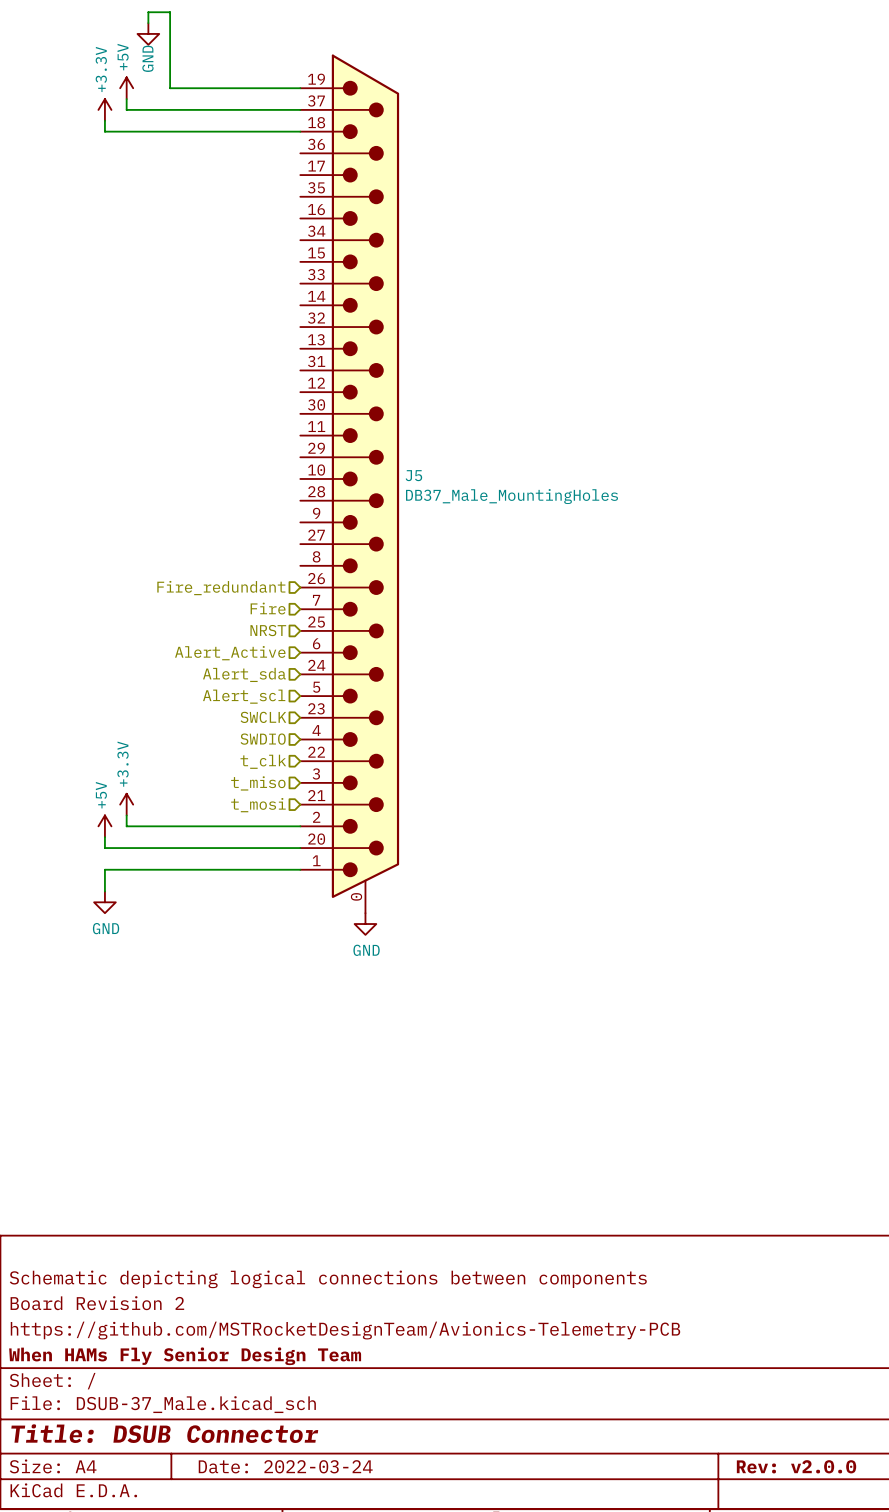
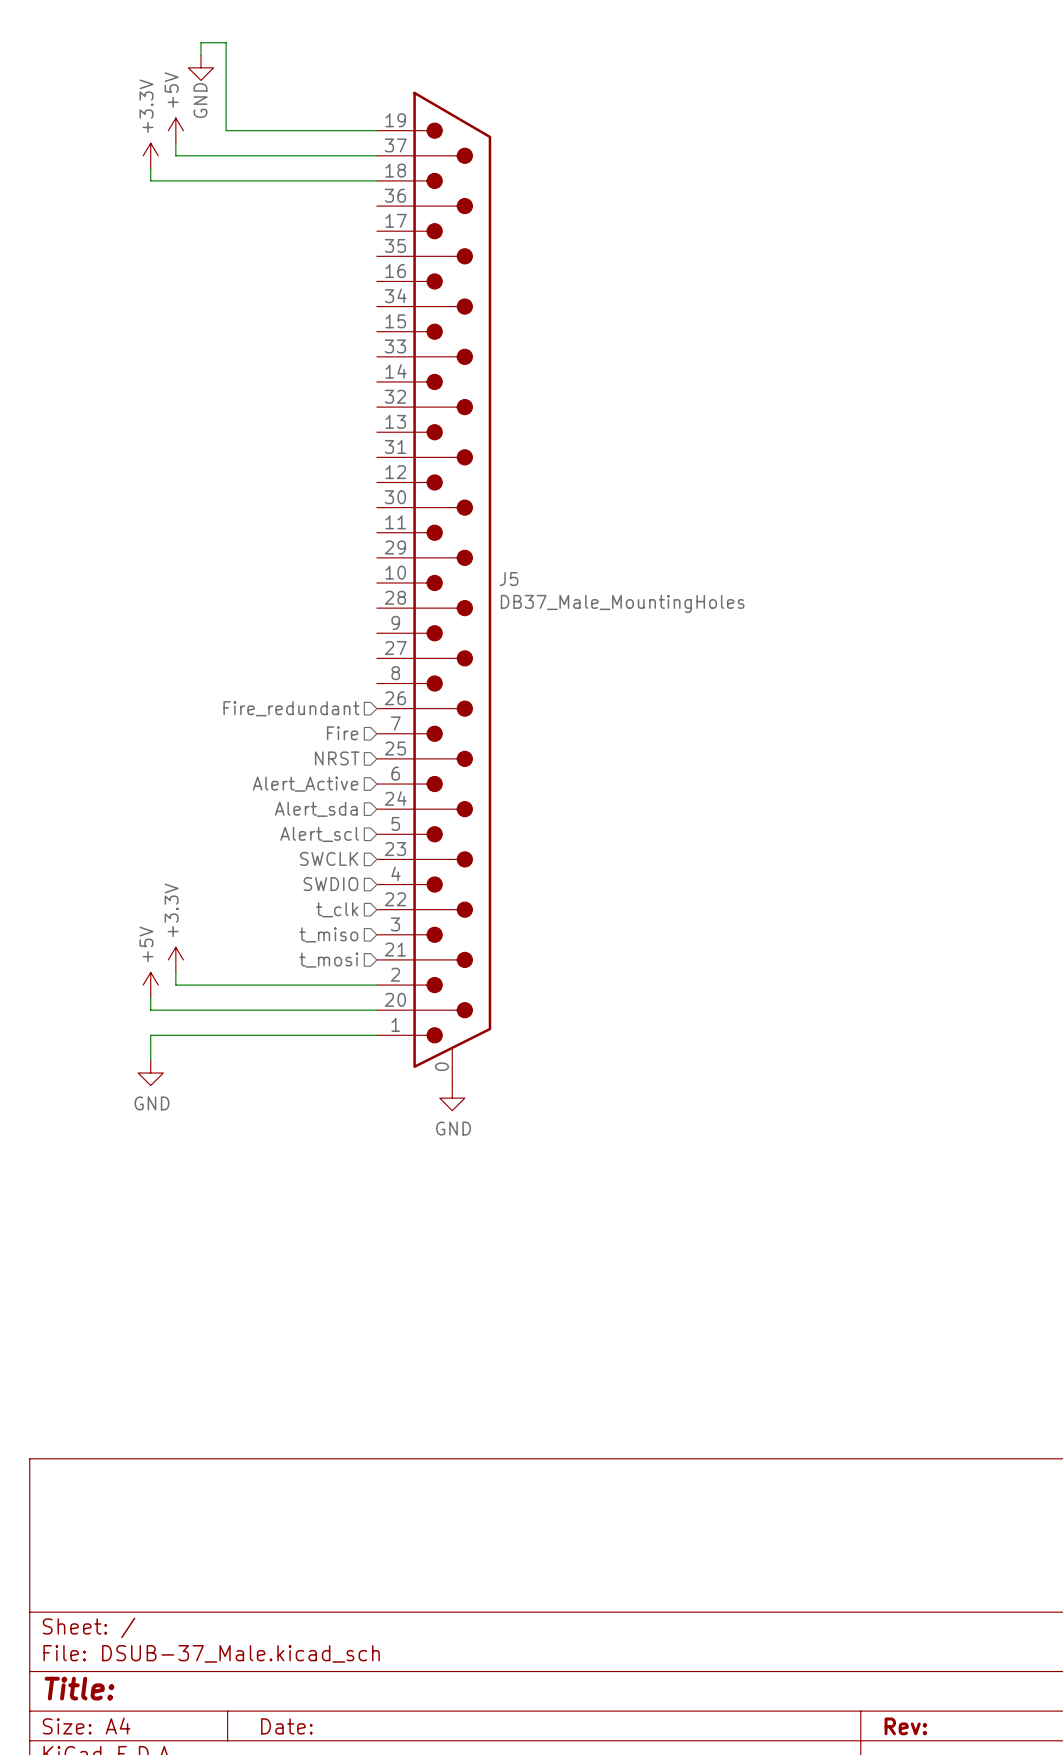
title block: Schematic depicting logical connections between components (328, 1279) -> none
title block: Board Revision 2 (97, 1303) -> none
title block: https://github.com/MSTRocketDesignTeam/Avionics-Telemetry-PCB (345, 1330) -> none
title block: When HAMs Fly Senior Design Team (185, 1356) -> none
title block: Title: DSUB Connector (164, 1433) -> Title: (79, 1688)
title block: Date: 2022-03-24 (285, 1466) -> Date: (286, 1726)
title block: Rev: v2.0.0 (796, 1466) -> Rev: (905, 1726)

